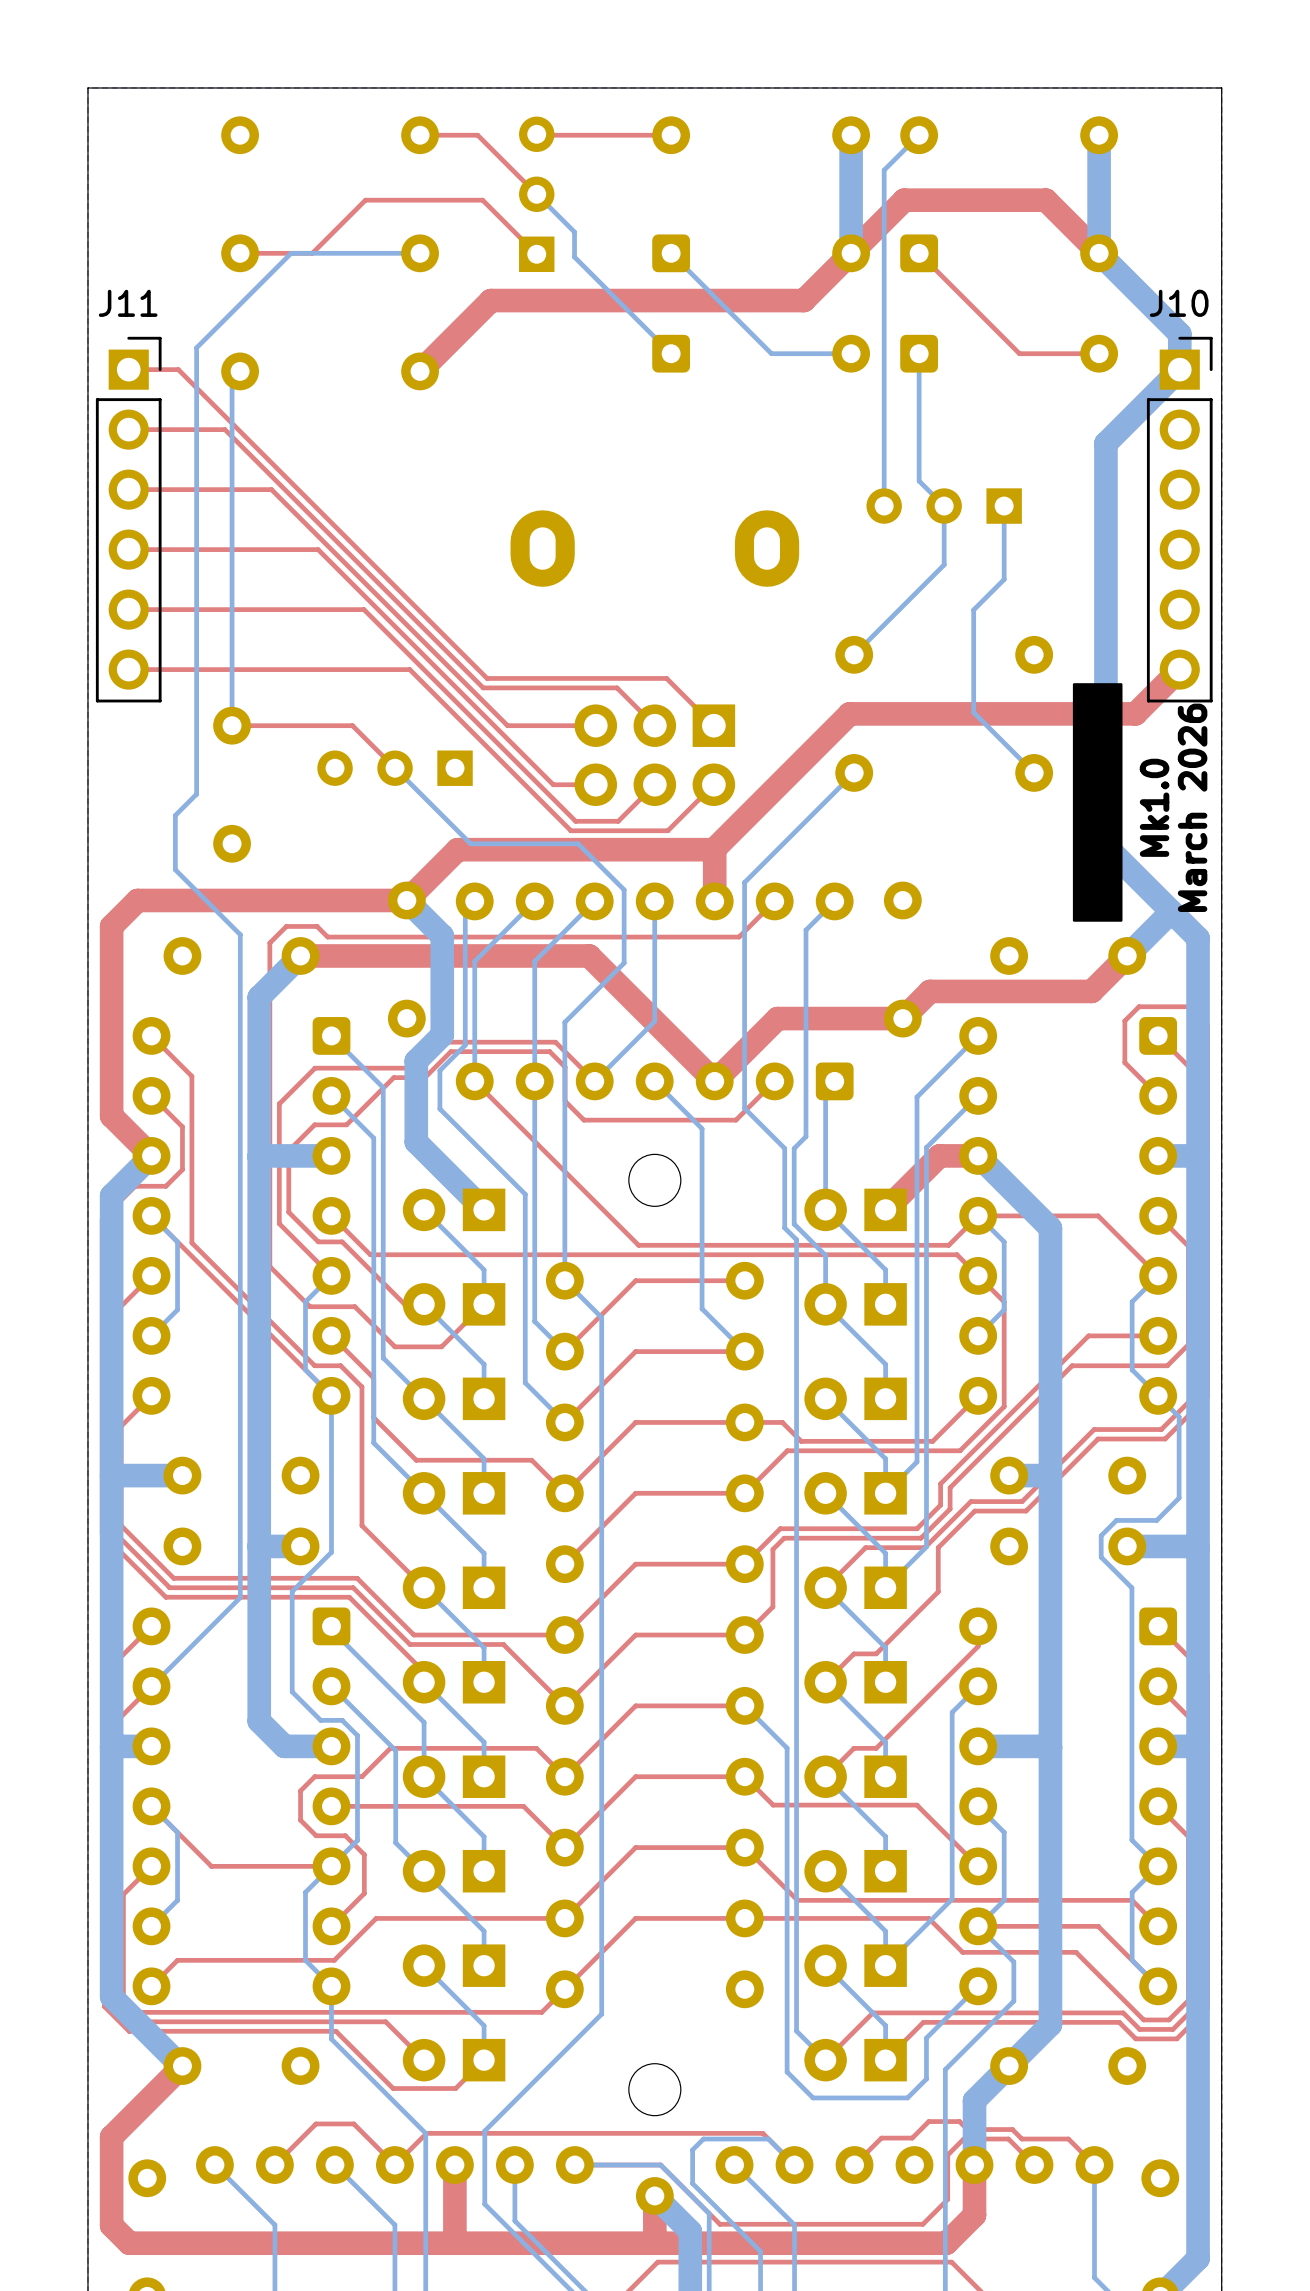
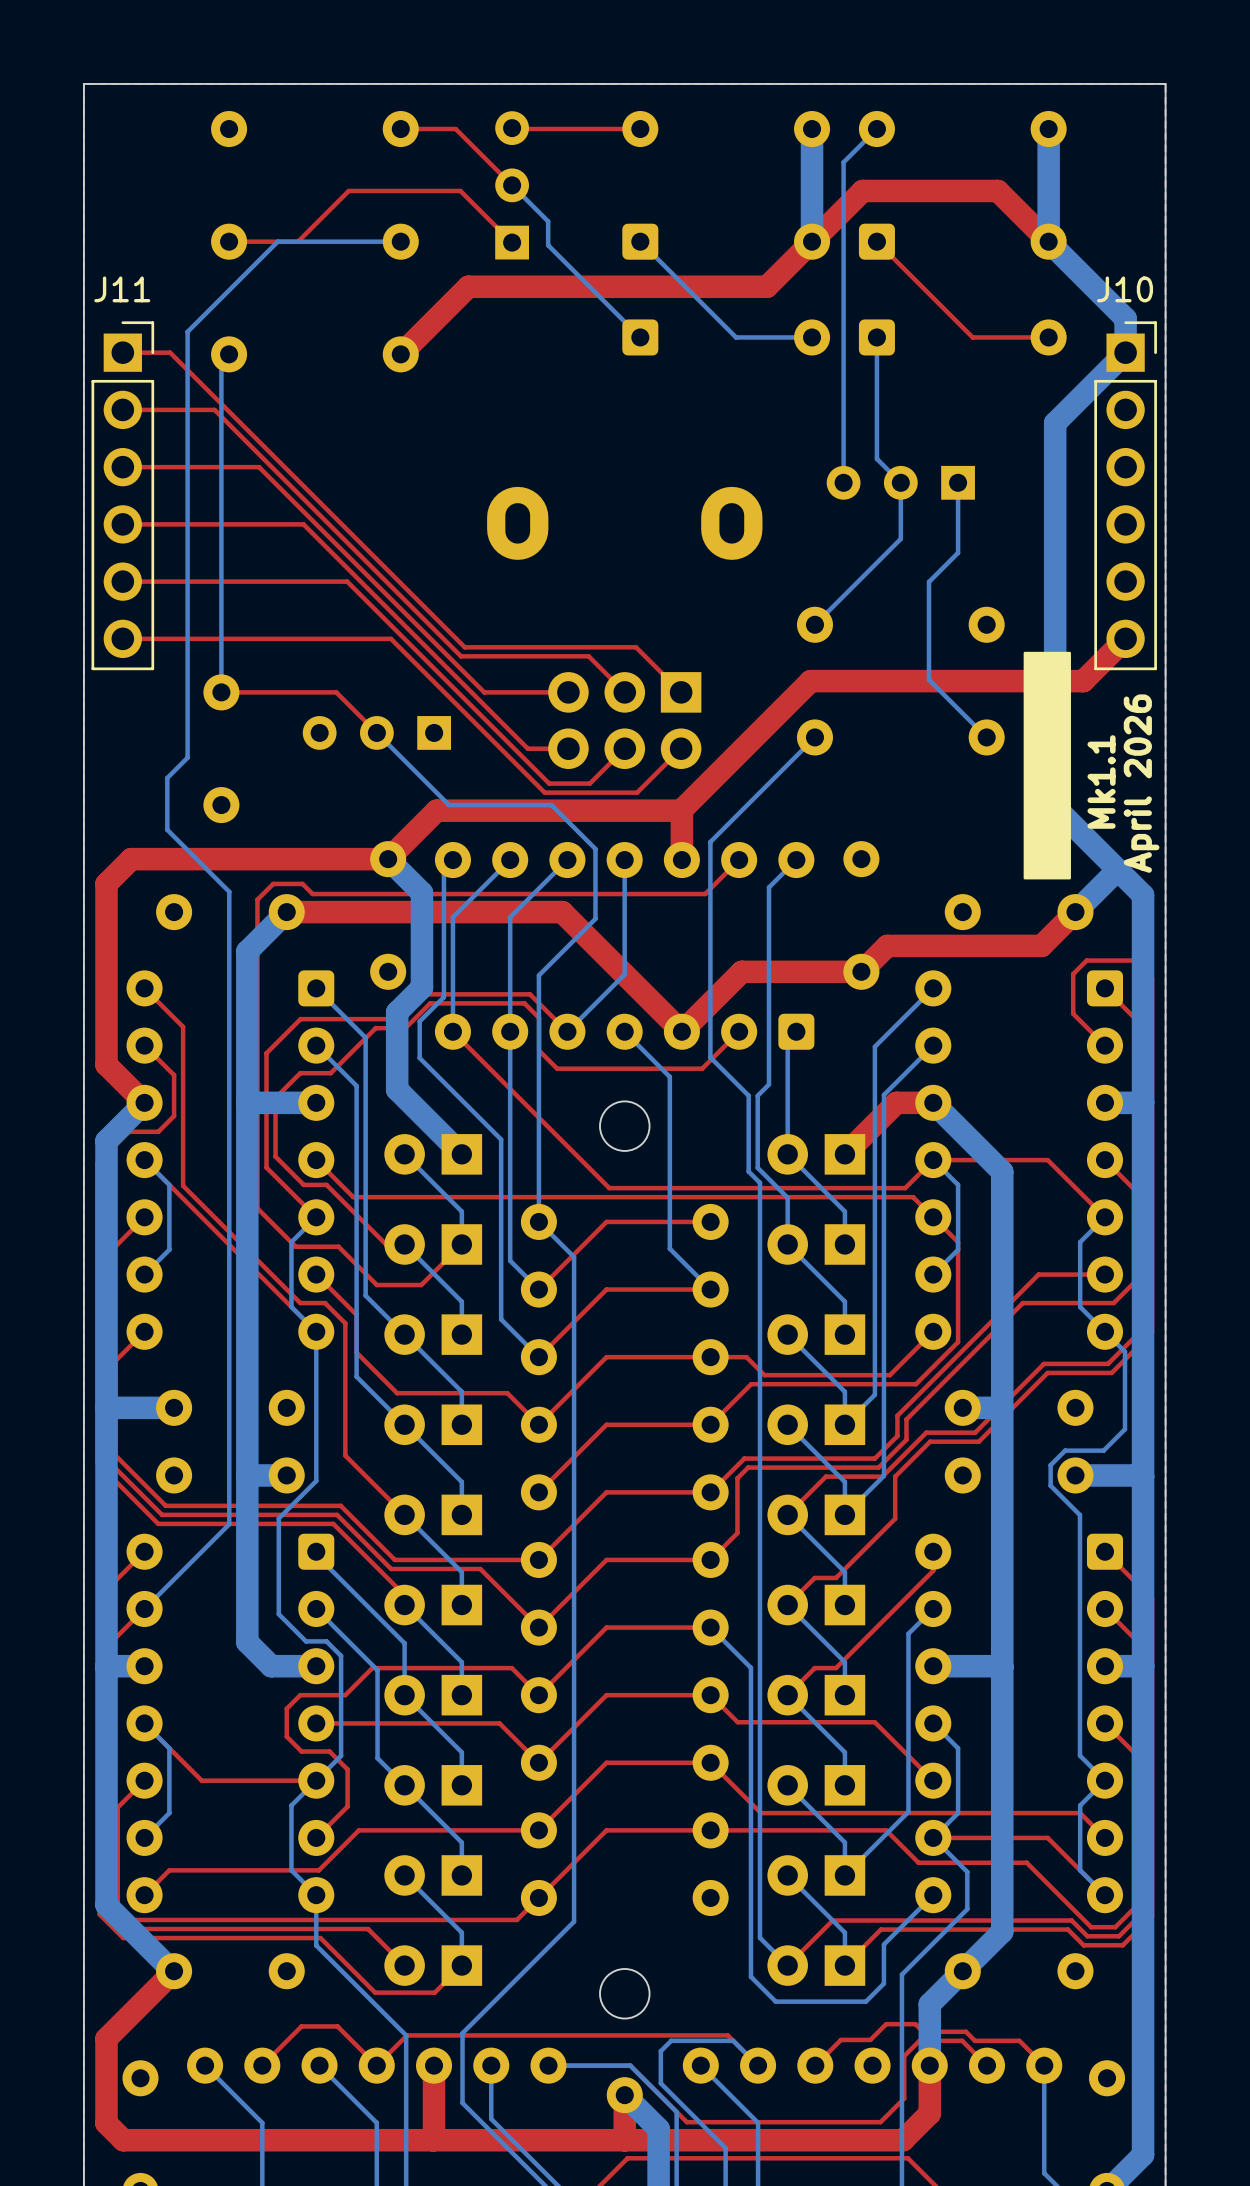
text: Mk1.0 (1154, 807) -> Mk1.1 (1101, 781)
text: March 2026 (1192, 807) -> April 2026 (1141, 783)

